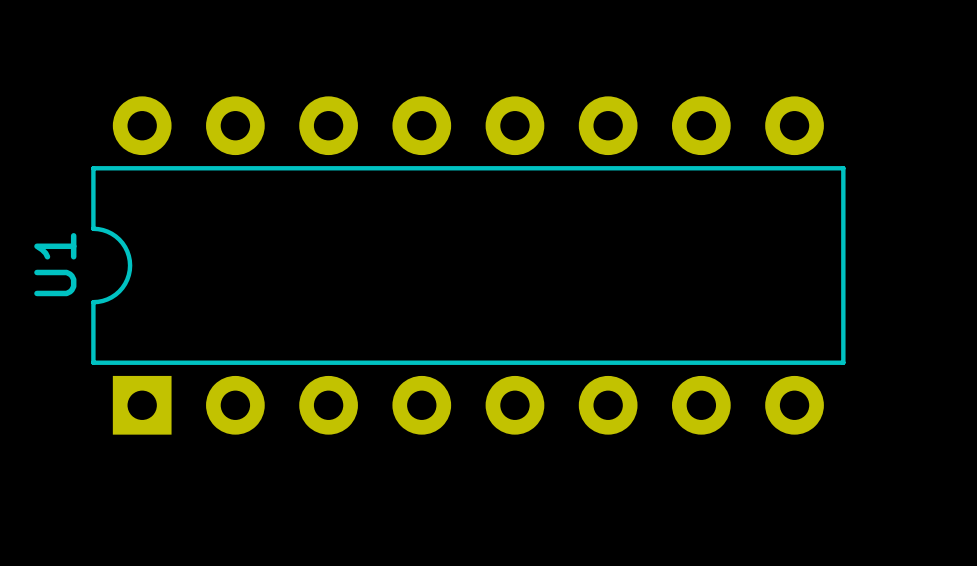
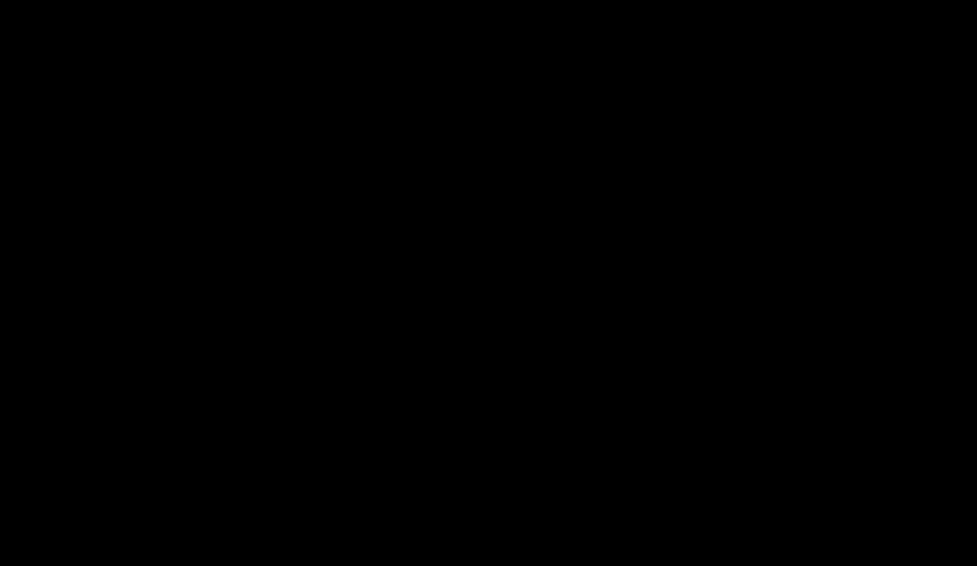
U1: (468, 265) -> none

